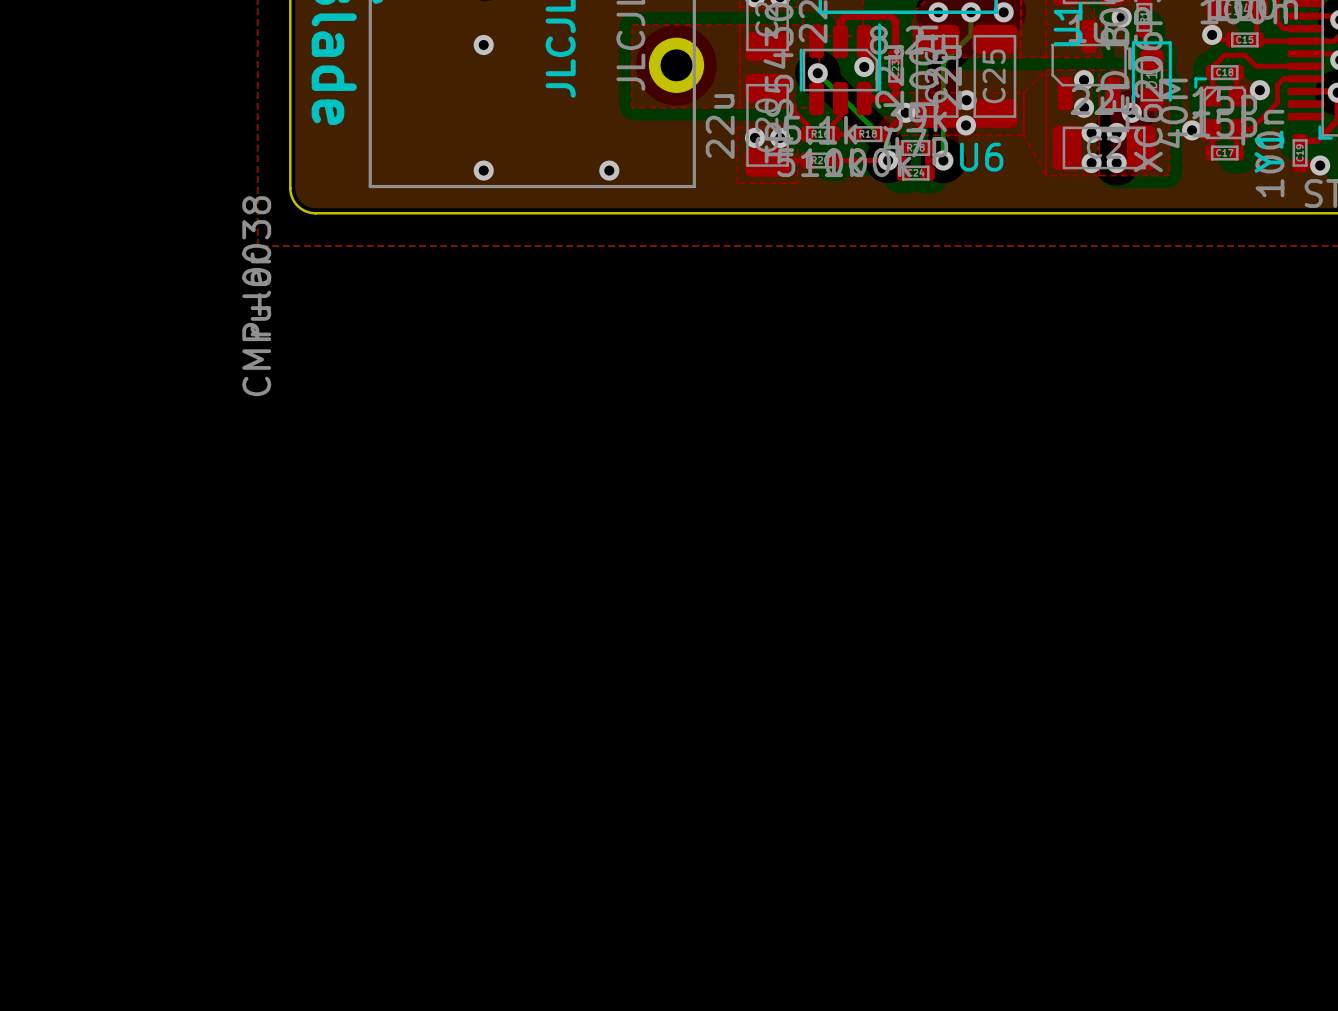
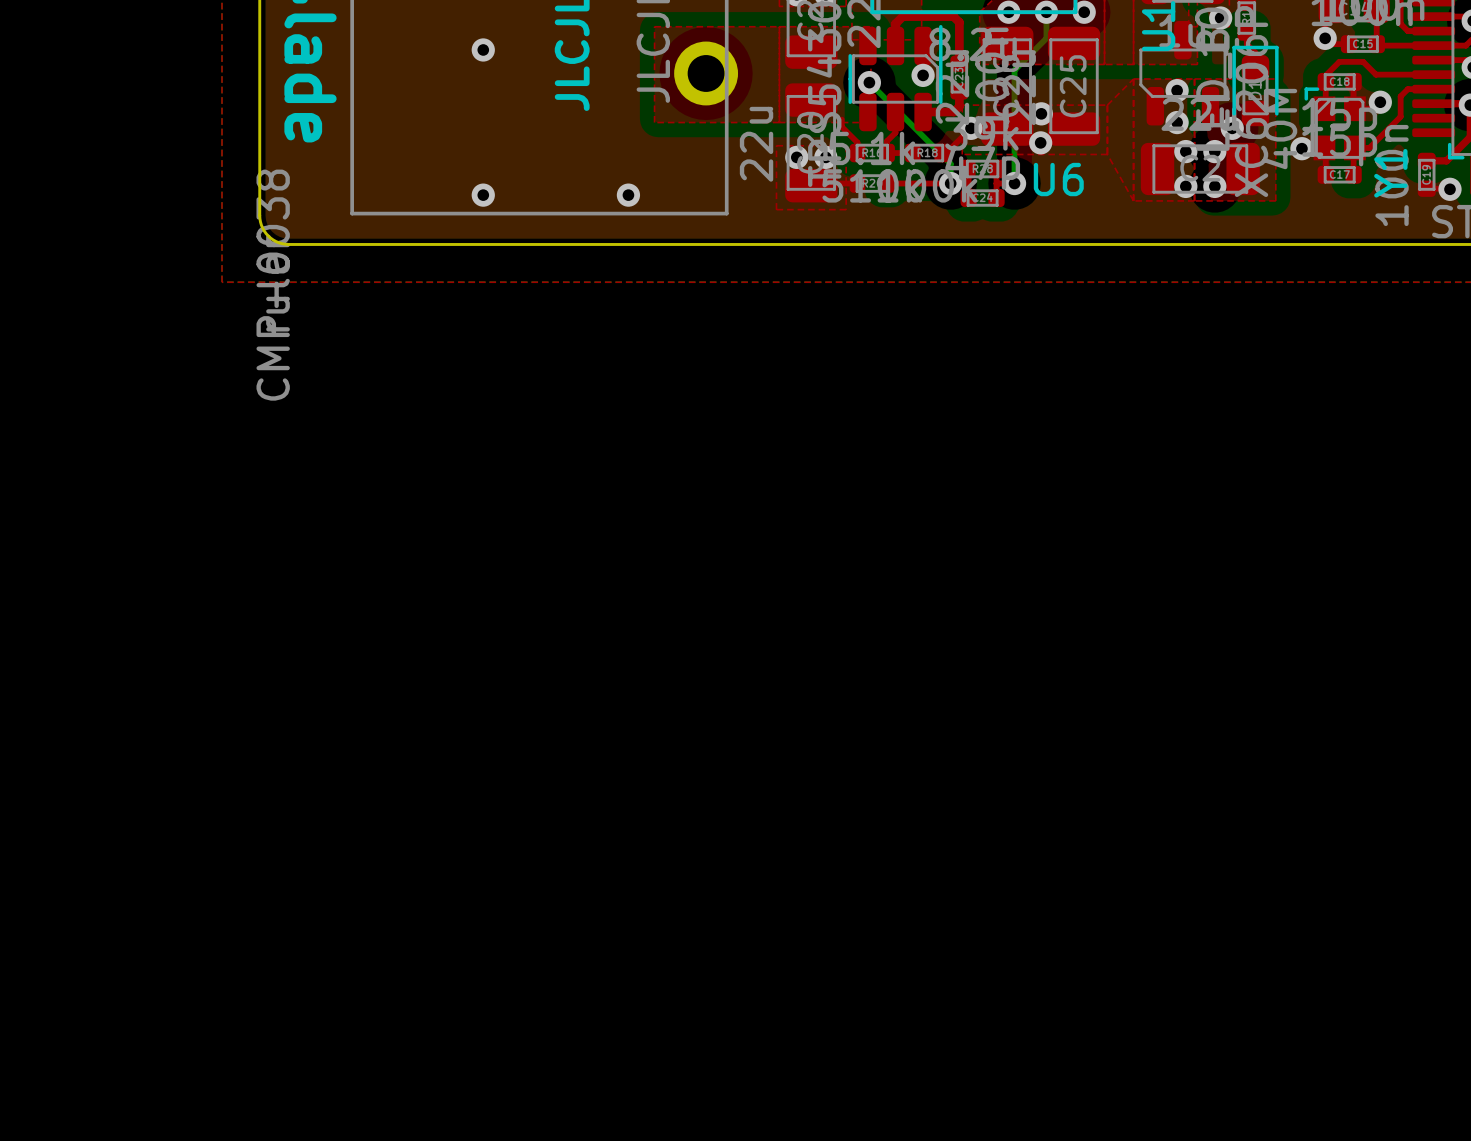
drawing position: (256, 296) -> (273, 285)

